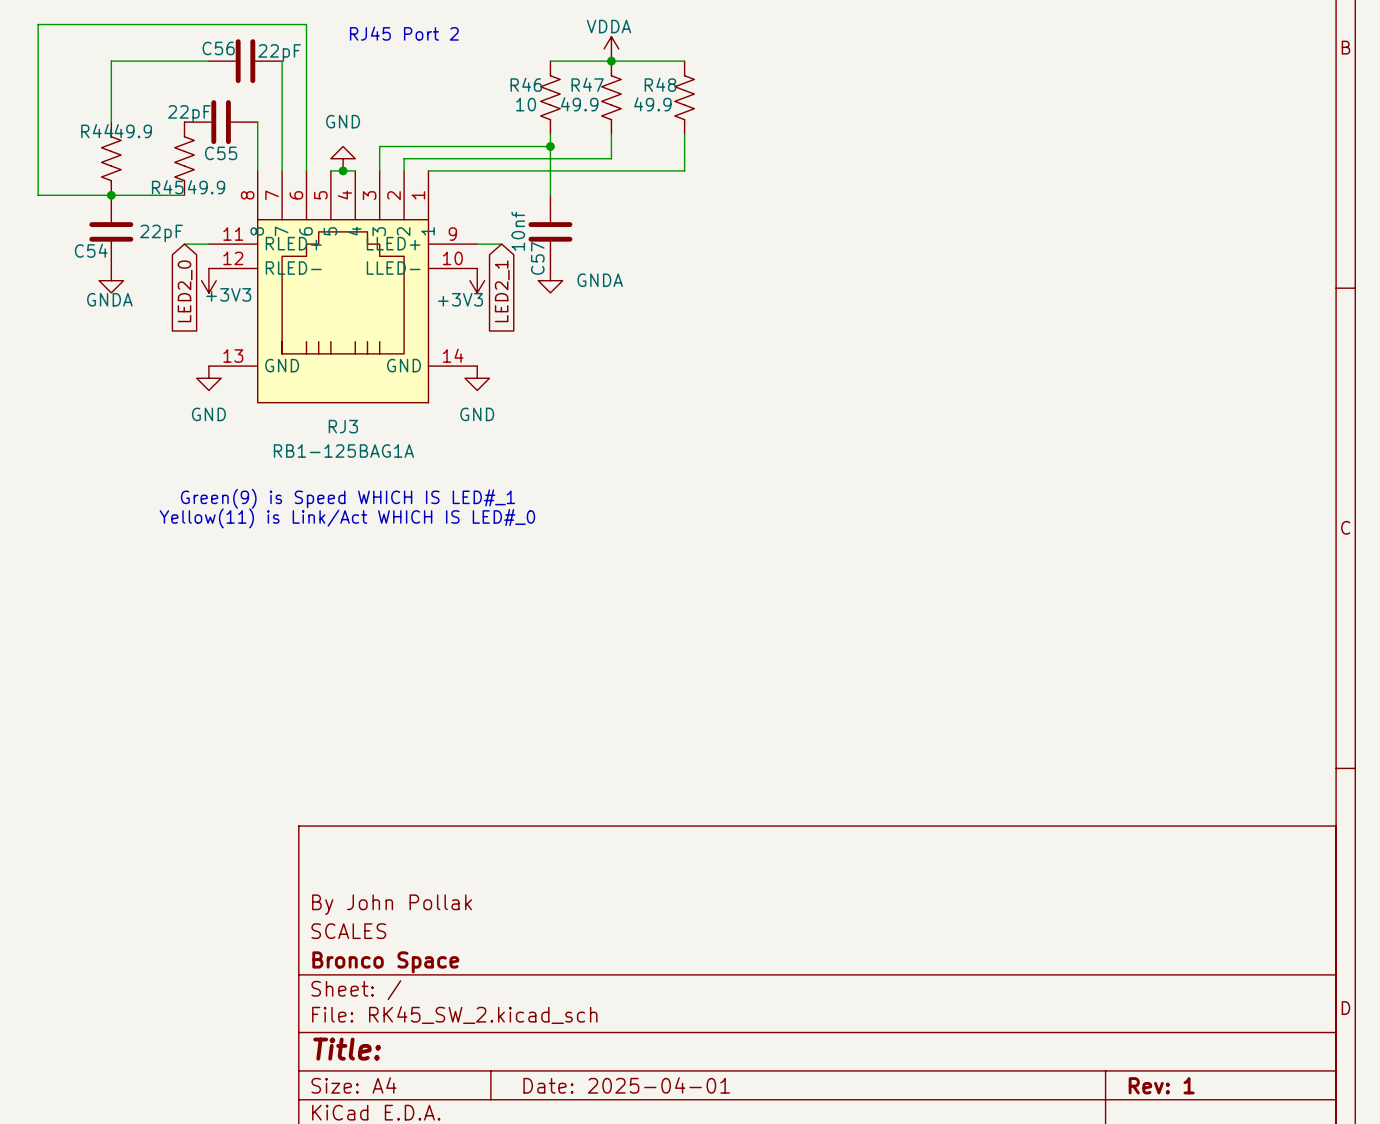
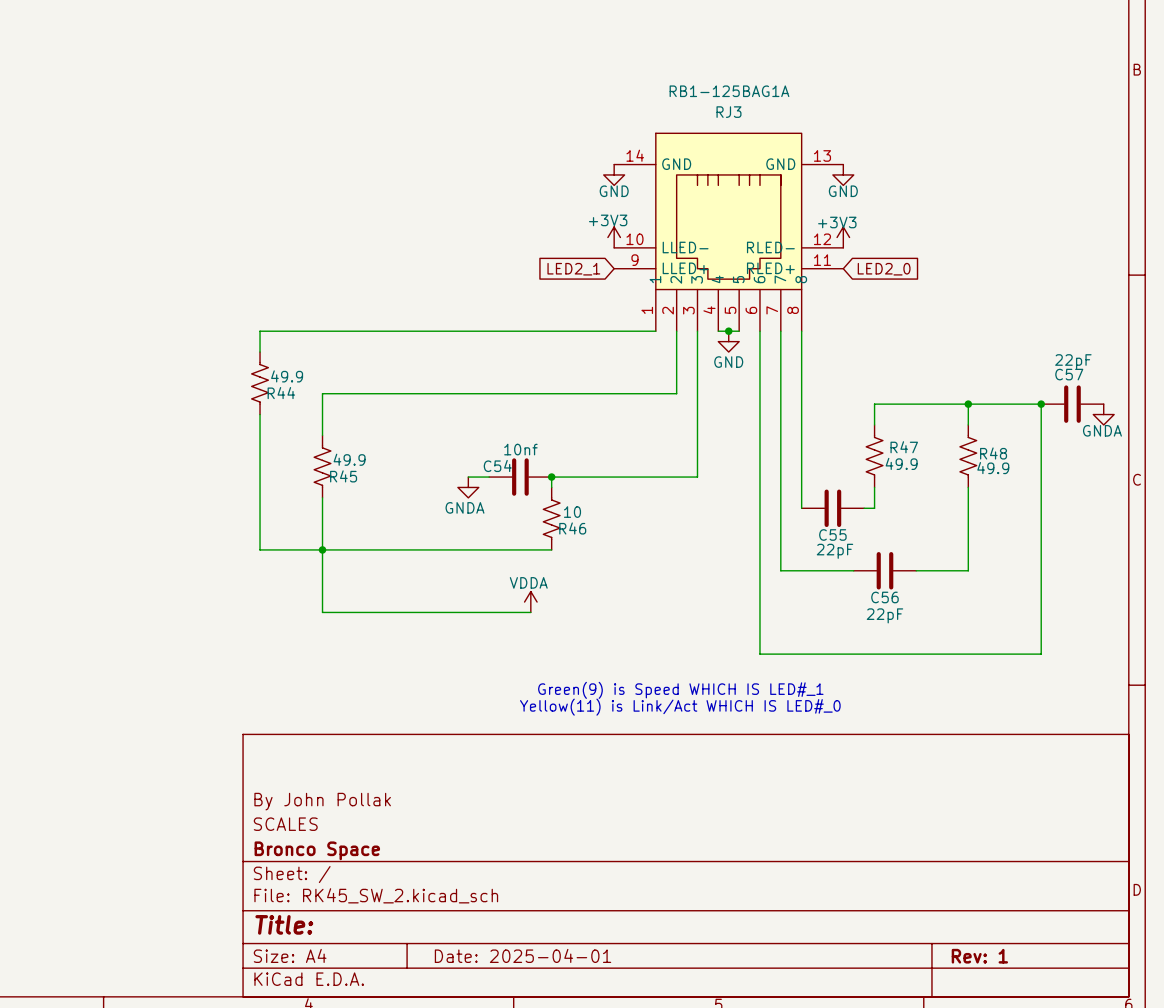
text: RJ45 Port 2 (404, 33) -> none
C56 name position: C56 (218, 48) -> C56 (884, 597)
power symbol: VDDA (611, 48) -> none
C56 value position: 22pF (279, 52) -> 22pF (884, 615)
wire: (208, 61) (111, 61) (111, 122) -> none
C56 position: (245, 61) -> (884, 570)
wire: (282, 61) (282, 170) -> none
wire: (550, 61) (684, 61) -> none
junction: (611, 61) -> none
R46 name position: R46 (526, 84) -> R46 (572, 528)
R47 name position: R47 (587, 84) -> R47 (904, 447)
R48 name position: R48 (660, 84) -> R48 (993, 453)
R46 position: (550, 97) -> (551, 518)
R47 position: (611, 97) -> (874, 456)
R48 position: (684, 97) -> (968, 456)
R46 value position: 10 (526, 104) -> 10 (572, 512)
R47 value position: 49.9 (579, 104) -> 49.9 (901, 463)
R48 value position: 49.9 (652, 104) -> 49.9 (993, 468)
C55 value position: 22pF (189, 113) -> 22pF (834, 551)
C55 position: (221, 122) -> (832, 508)
wire: (257, 122) (257, 170) -> none
R44 name position: R44 (97, 131) -> R44 (281, 393)
R44 value position: 49.9 (133, 131) -> 49.9 (287, 376)
wire: (550, 134) (550, 195) -> none
wire: (611, 134) (611, 158) (404, 158) (404, 170) -> none
wire: (684, 134) (684, 170) (428, 170) -> none
wire: (550, 146) (379, 146) (379, 170) -> none
junction: (550, 146) -> none
R44 position: (111, 158) -> (260, 383)
R45 position: (184, 158) -> (322, 466)
power symbol: GND (343, 158) -> none
wire: (306, 170) (306, 24) (38, 24) (38, 195) (184, 195) -> none
wire: (330, 170) (355, 170) -> none
junction: (343, 170) -> none
power symbol: none -> GND (614, 174)
power symbol: none -> GND (843, 174)
R45 name position: R45 (167, 187) -> R45 (343, 476)
R45 value position: 49.9 (206, 187) -> 49.9 (349, 459)
junction: (111, 195) -> none
C54 rotation: 0° (111, 231) -> 90° clockwise (520, 477)
C54 position: (111, 231) -> (520, 477)
C57 value: 10nf (518, 231) -> 22pF (1073, 361)
C57 rotation: 0° (550, 231) -> 90° clockwise (1072, 404)
C57 position: (550, 231) -> (1072, 404)
C54 value: 22pF (161, 233) -> 10nf (520, 449)
wire: (184, 244) (208, 244) -> none
wire: (477, 244) (501, 244) -> none
power symbol: none -> +3V3 (614, 237)
power symbol: none -> +3V3 (843, 237)
C57 name position: C57 (537, 258) -> C57 (1069, 374)
power symbol: GNDA (111, 280) -> none
power symbol: +3V3 (208, 280) -> none
power symbol: +3V3 (477, 280) -> none
power symbol: GNDA (550, 280) -> none
global label: none -> LED2_0 (884, 269)
RJ3 position: (343, 286) -> (728, 232)
global label: LED2_0 (185, 291) -> none
global label rotation: 0° (502, 291) -> 90° clockwise (573, 269)
global label position: LED2_1 (502, 291) -> LED2_1 (573, 269)
RJ3 rotation: 0° (343, 311) -> 180° (728, 211)
wire: none -> (655, 331) (260, 331) (260, 352)
wire: none -> (676, 331) (676, 393) (322, 393) (322, 435)
wire: none -> (697, 331) (697, 477) (551, 477) (551, 487)
wire: none -> (718, 331) (739, 331)
junction: none -> (728, 331)
wire: none -> (759, 331) (759, 654) (1041, 654) (1041, 404) (874, 404) (874, 424)
wire: none -> (780, 331) (780, 570) (853, 570)
wire: none -> (801, 331) (801, 508)
power symbol: none -> GND (728, 341)
power symbol: GND (208, 378) -> none
power symbol: GND (477, 378) -> none
wire: none -> (968, 404) (968, 424)
junction: none -> (968, 404)
junction: none -> (1041, 404)
wire: none -> (260, 414) (260, 549) (551, 549)
power symbol: none -> GNDA (1103, 414)
text: Green(9) is Speed WHICH IS LED#_1 (347, 498) -> none
text: Yellow(11) is Link/Act WHICH IS LED#_0 (347, 518) -> none
wire: none -> (468, 477) (489, 477)
junction: none -> (551, 477)
power symbol: none -> GNDA (468, 487)
wire: none -> (874, 487) (874, 508) (864, 508)
wire: none -> (968, 487) (968, 570) (916, 570)
wire: none -> (322, 497) (322, 612) (530, 612)
junction: none -> (322, 549)
power symbol: none -> VDDA (530, 602)
text: none -> Green(9) is Speed WHICH IS LED#_1 (680, 690)
text: none -> Yellow(11) is Link/Act WHICH IS LED#_0 (680, 707)

